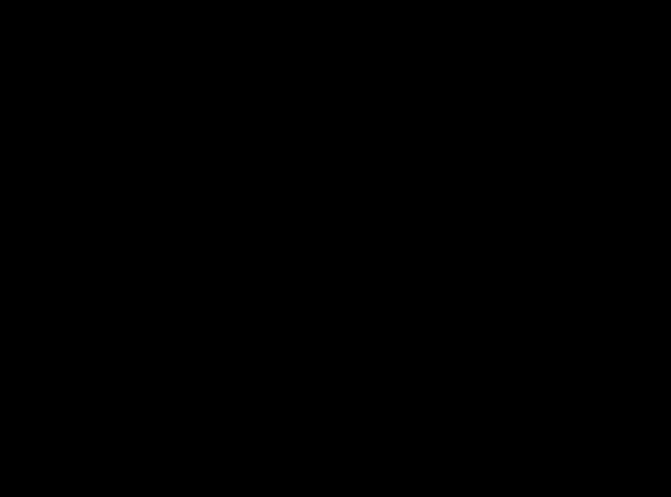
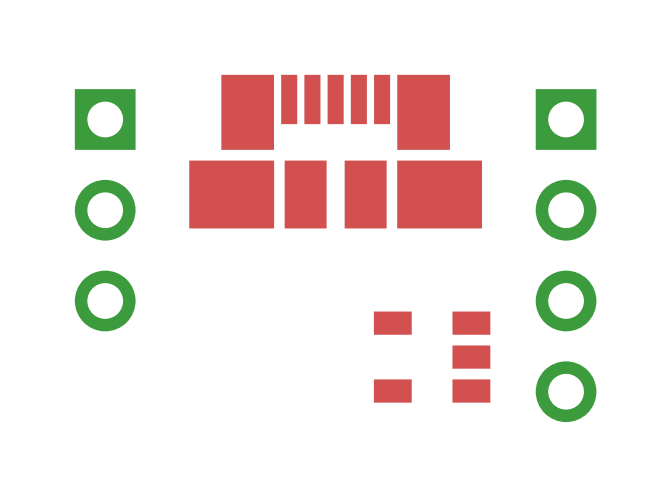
part: none -> (335, 151)
part: none -> (105, 210)
part: none -> (566, 255)
part: none -> (432, 357)

